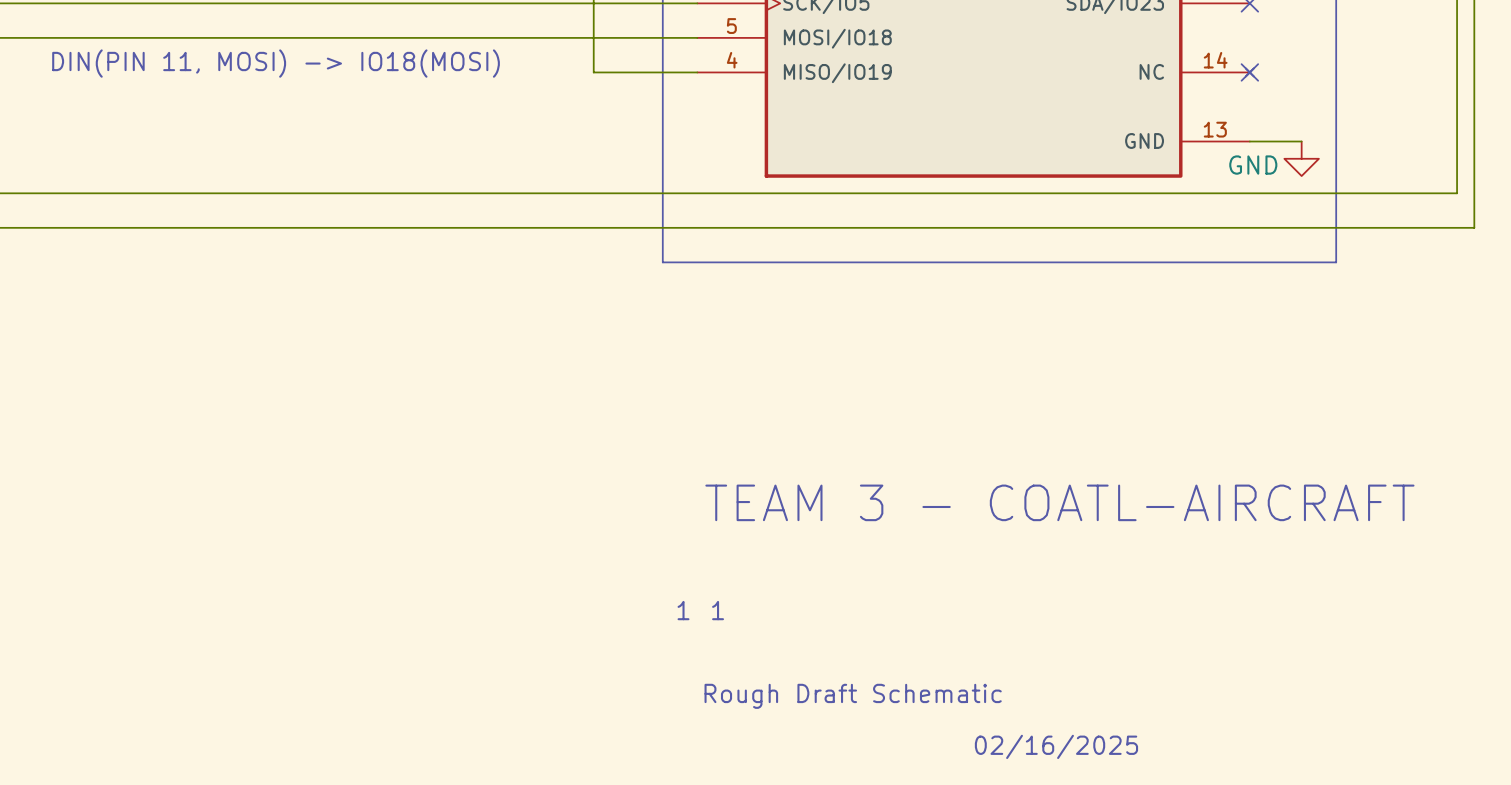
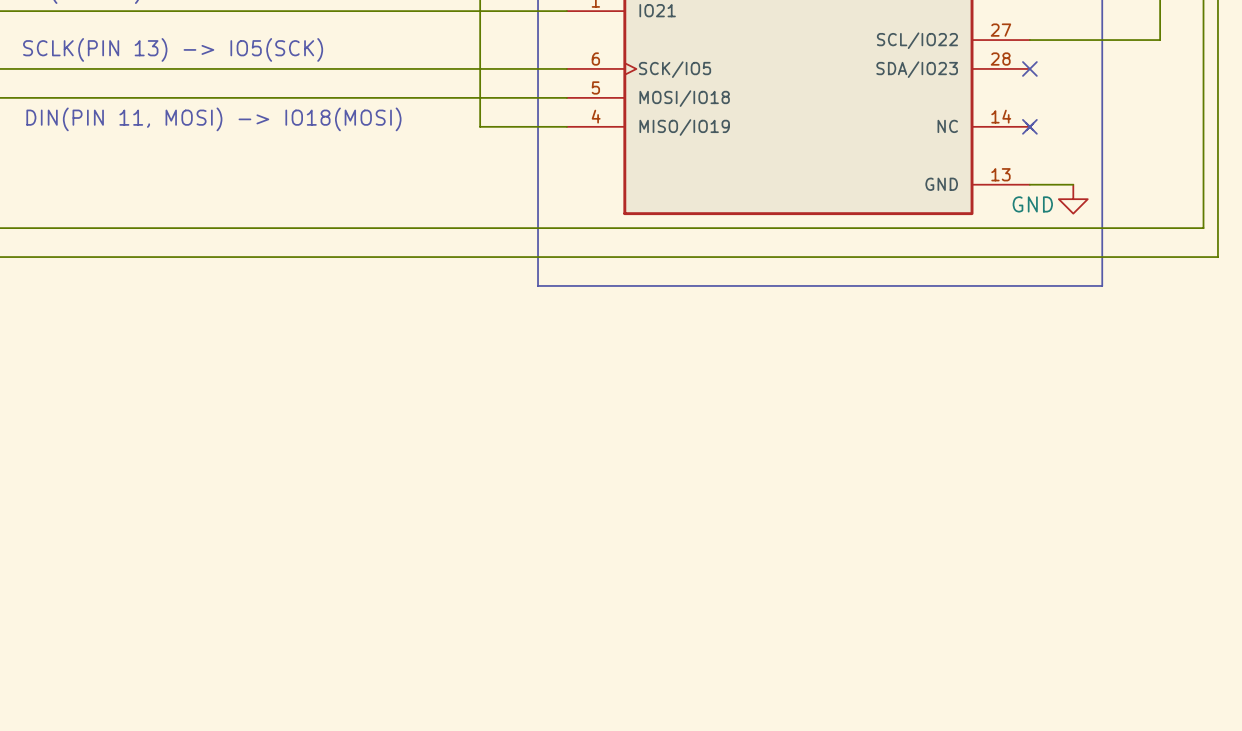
text: TEAM 3 - COATL-AIRCRAFT (1059, 502) -> none
text: 1 (683, 610) -> none
text: 1 (718, 610) -> none
text: Rough Draft Schematic (853, 696) -> none
text: 02/16/2025 (1056, 746) -> none

